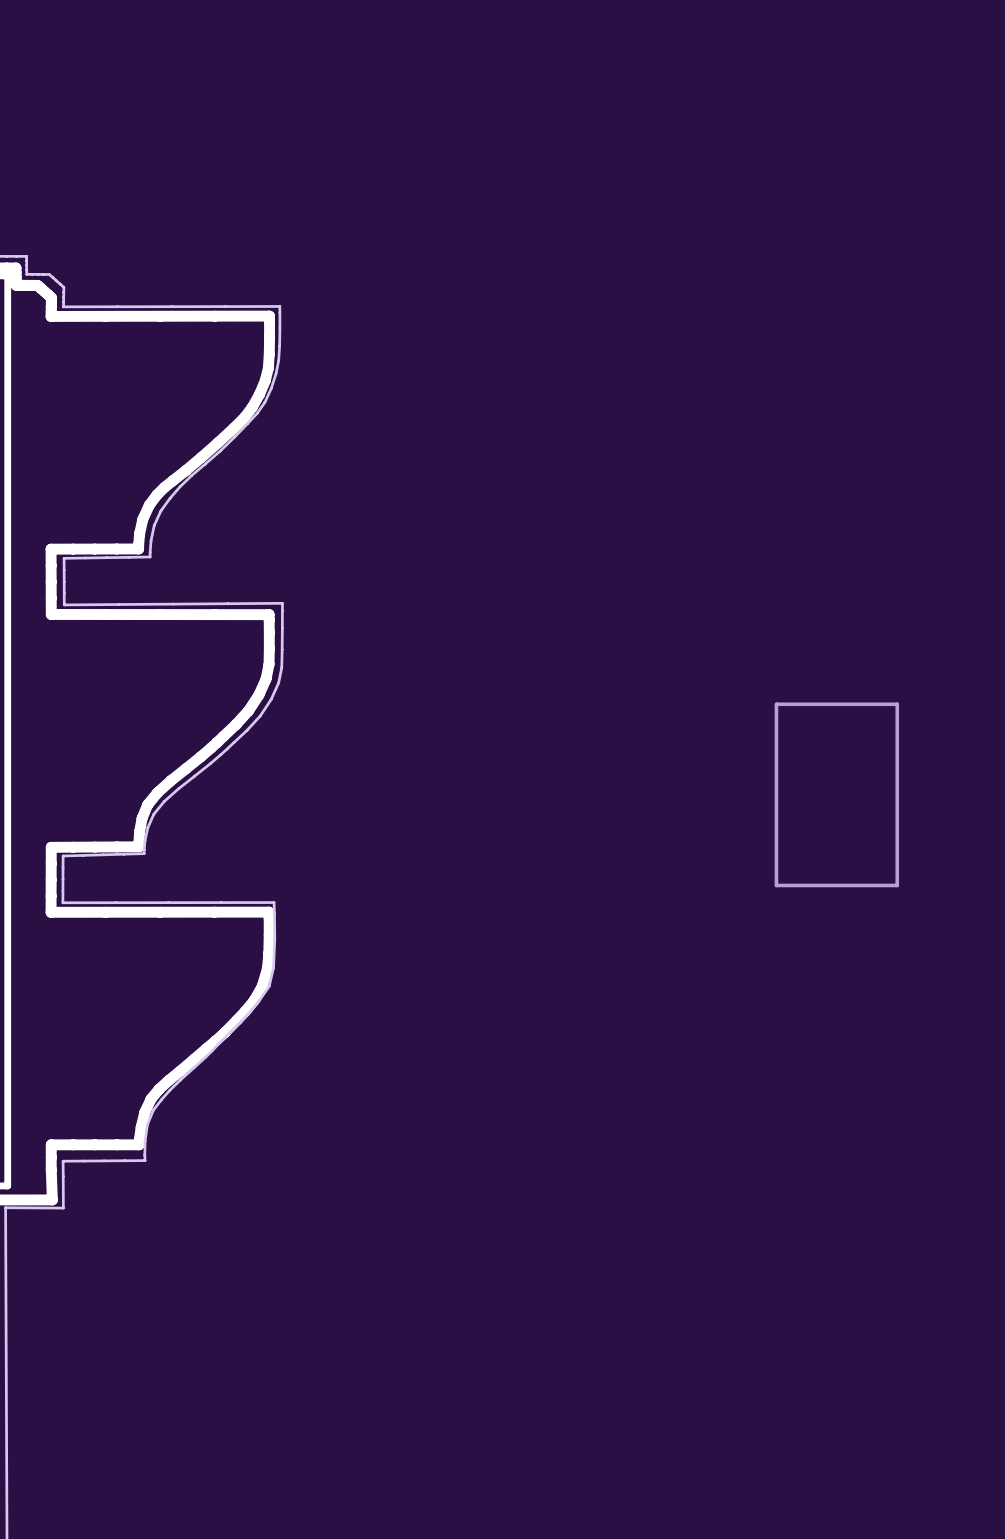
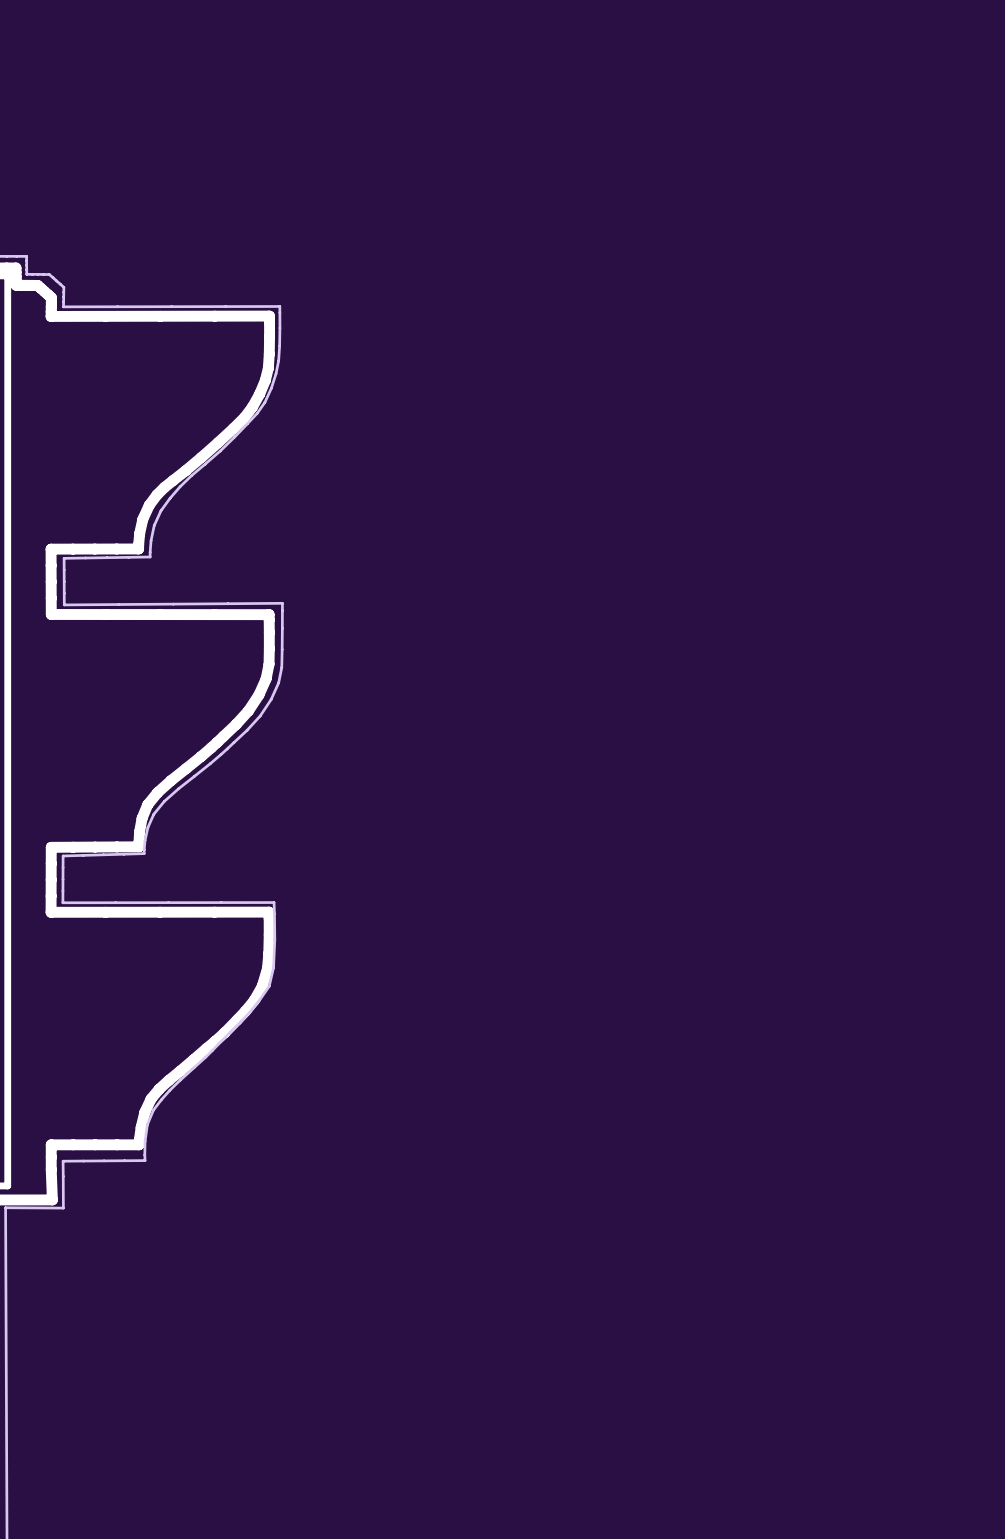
line: (776, 704) (776, 885) (897, 885) (897, 704) (776, 704) -> none

